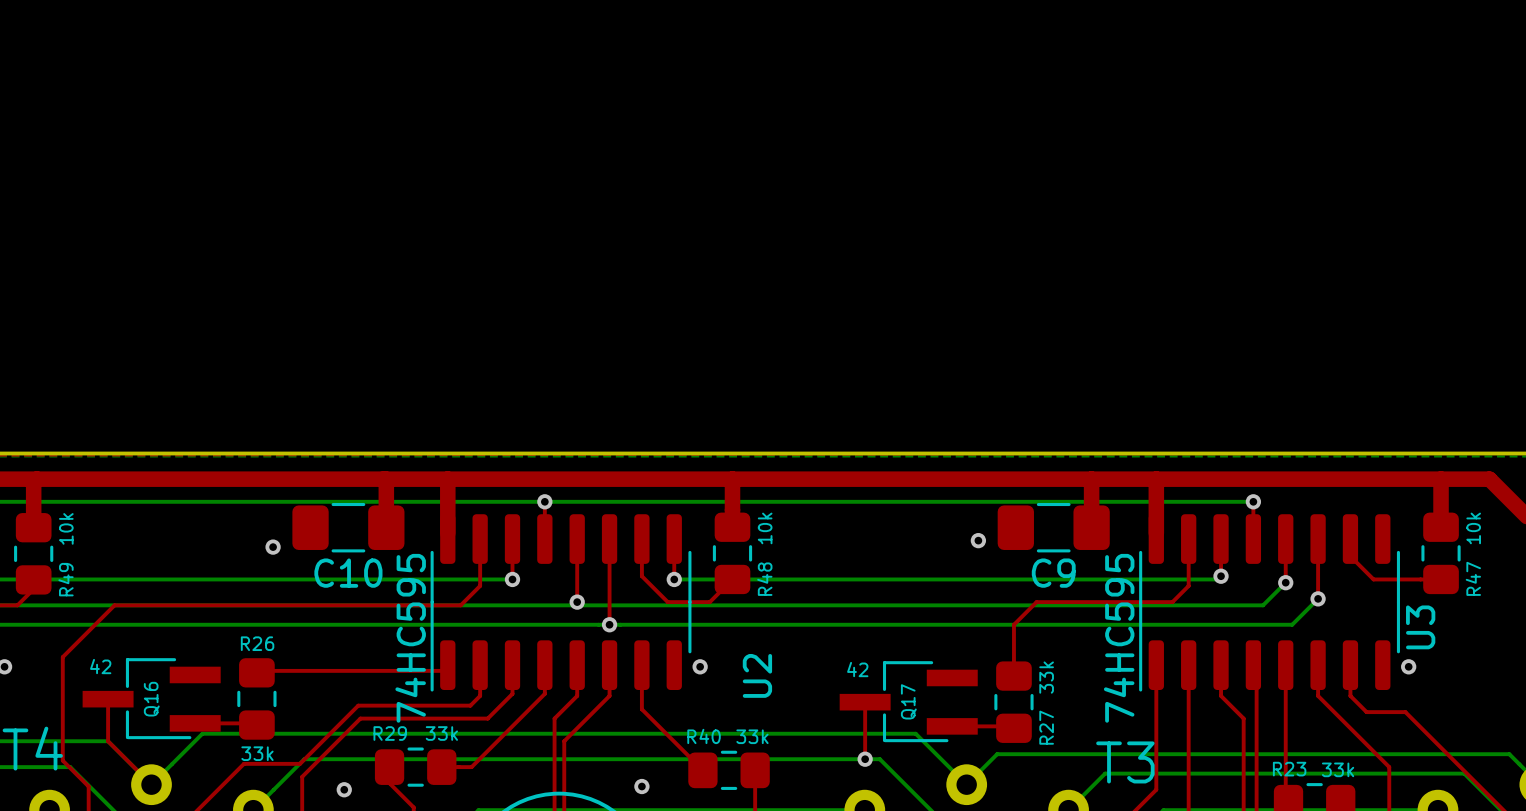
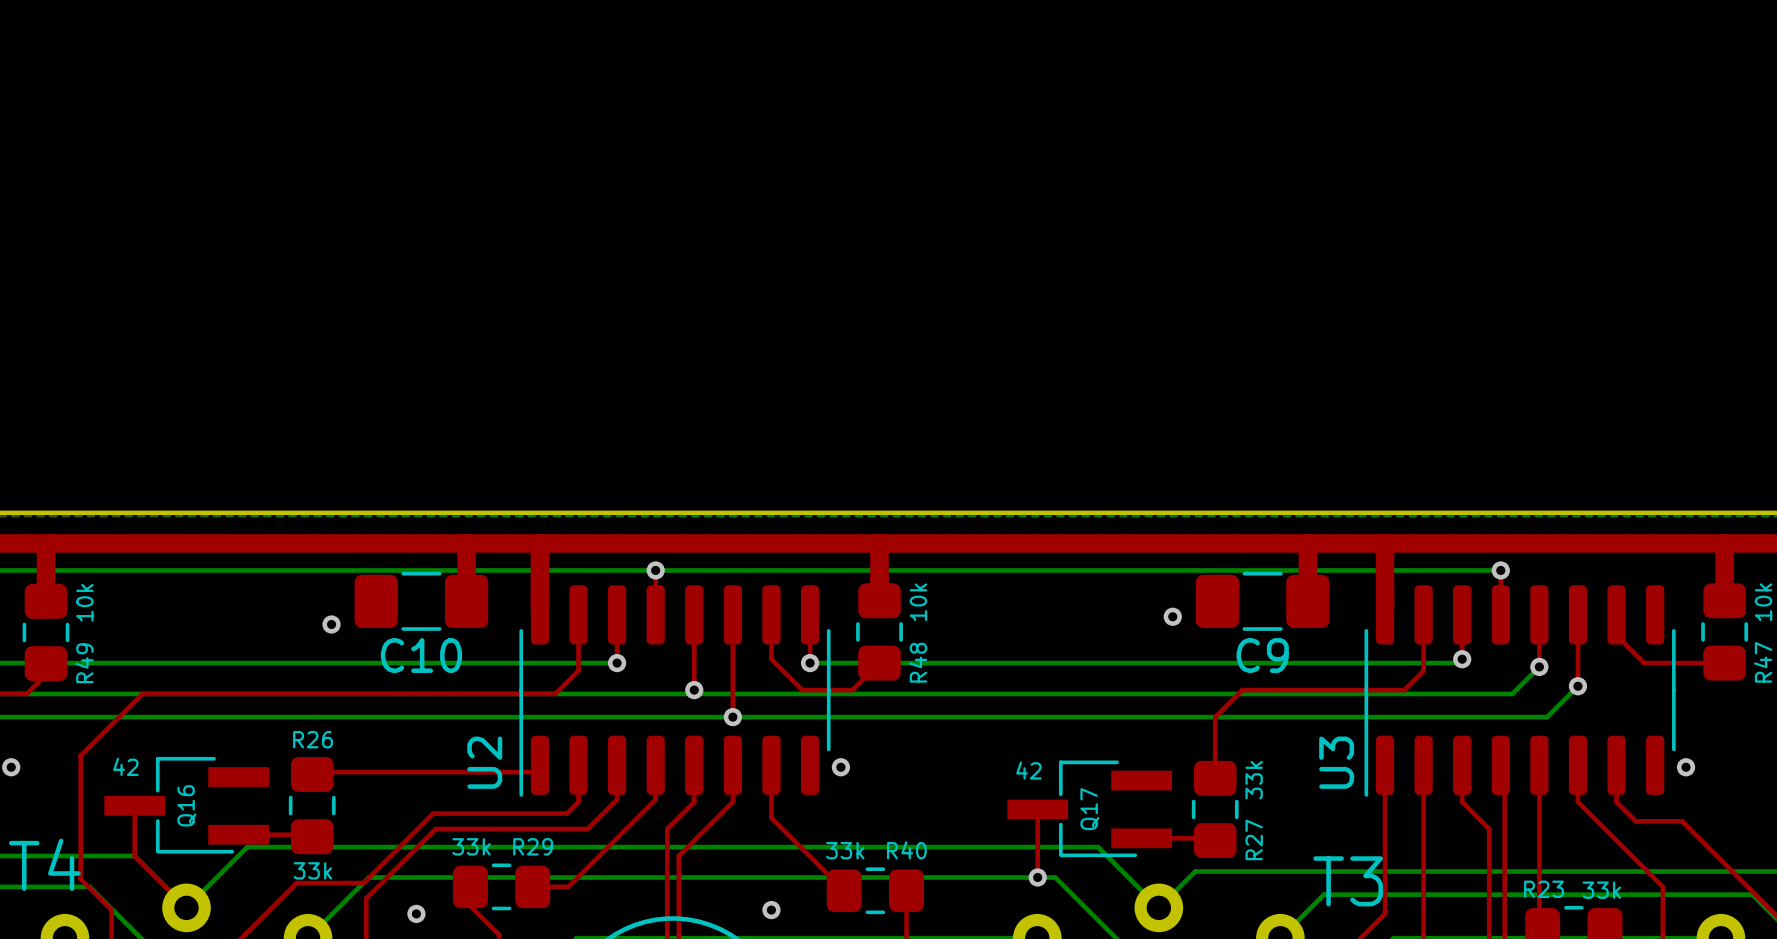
U3 name position: U3 (1420, 627) -> U3 (1336, 762)
U2 value: 74HC595 (410, 638) -> none
U3 value: 74HC595 (1119, 638) -> none
U2 name position: U2 (757, 675) -> U2 (484, 762)
R29 name position: R29 (390, 733) -> R29 (533, 846)
R29 value position: 33k (441, 733) -> 33k (471, 846)
R40 name position: R40 (704, 736) -> R40 (906, 850)
R40 value position: 33k (752, 736) -> 33k (845, 850)

